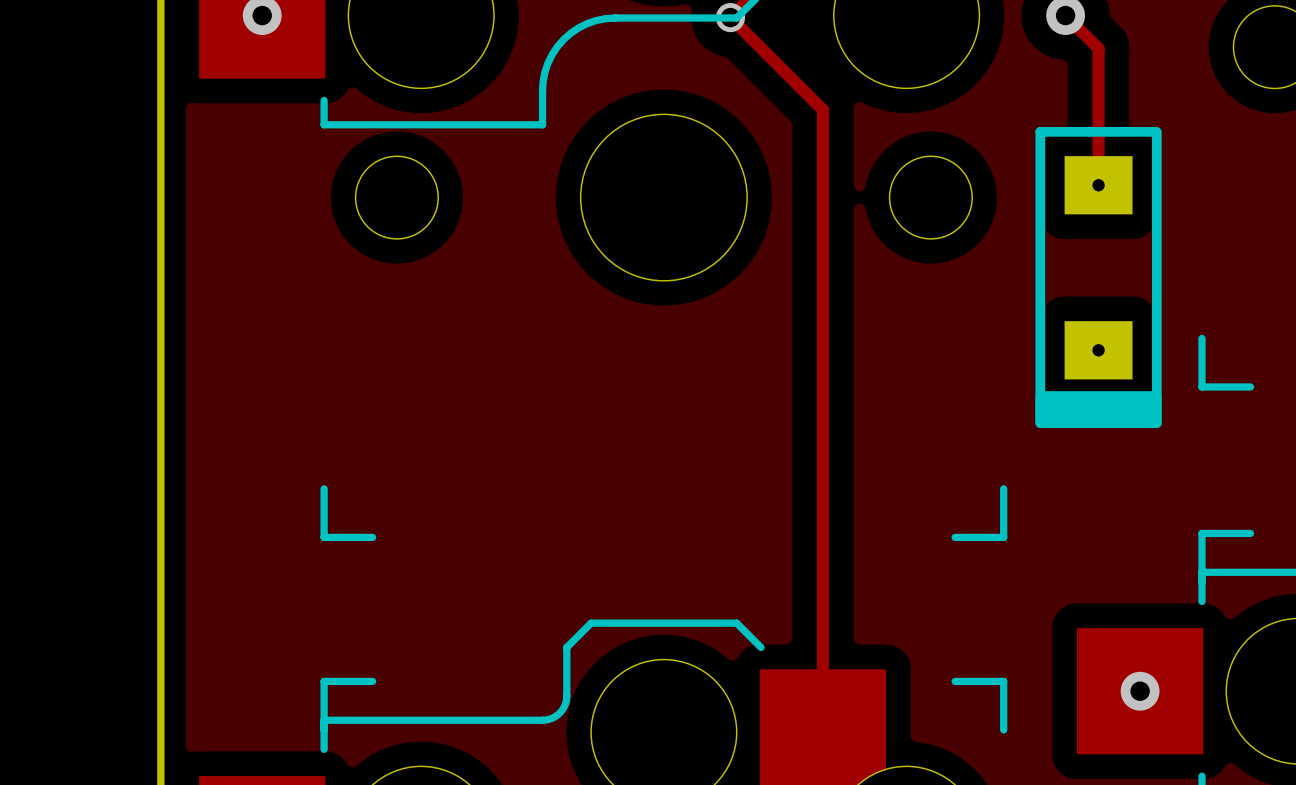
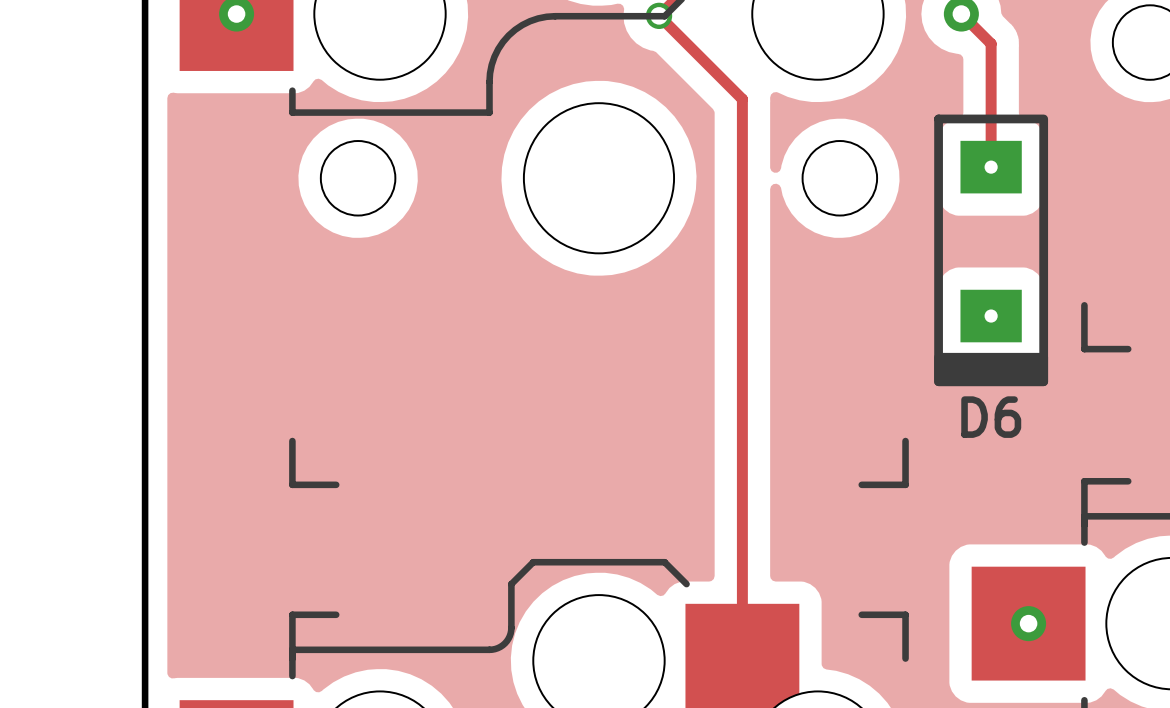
part: (1098, 277) -> none
D6: none -> (991, 250)

